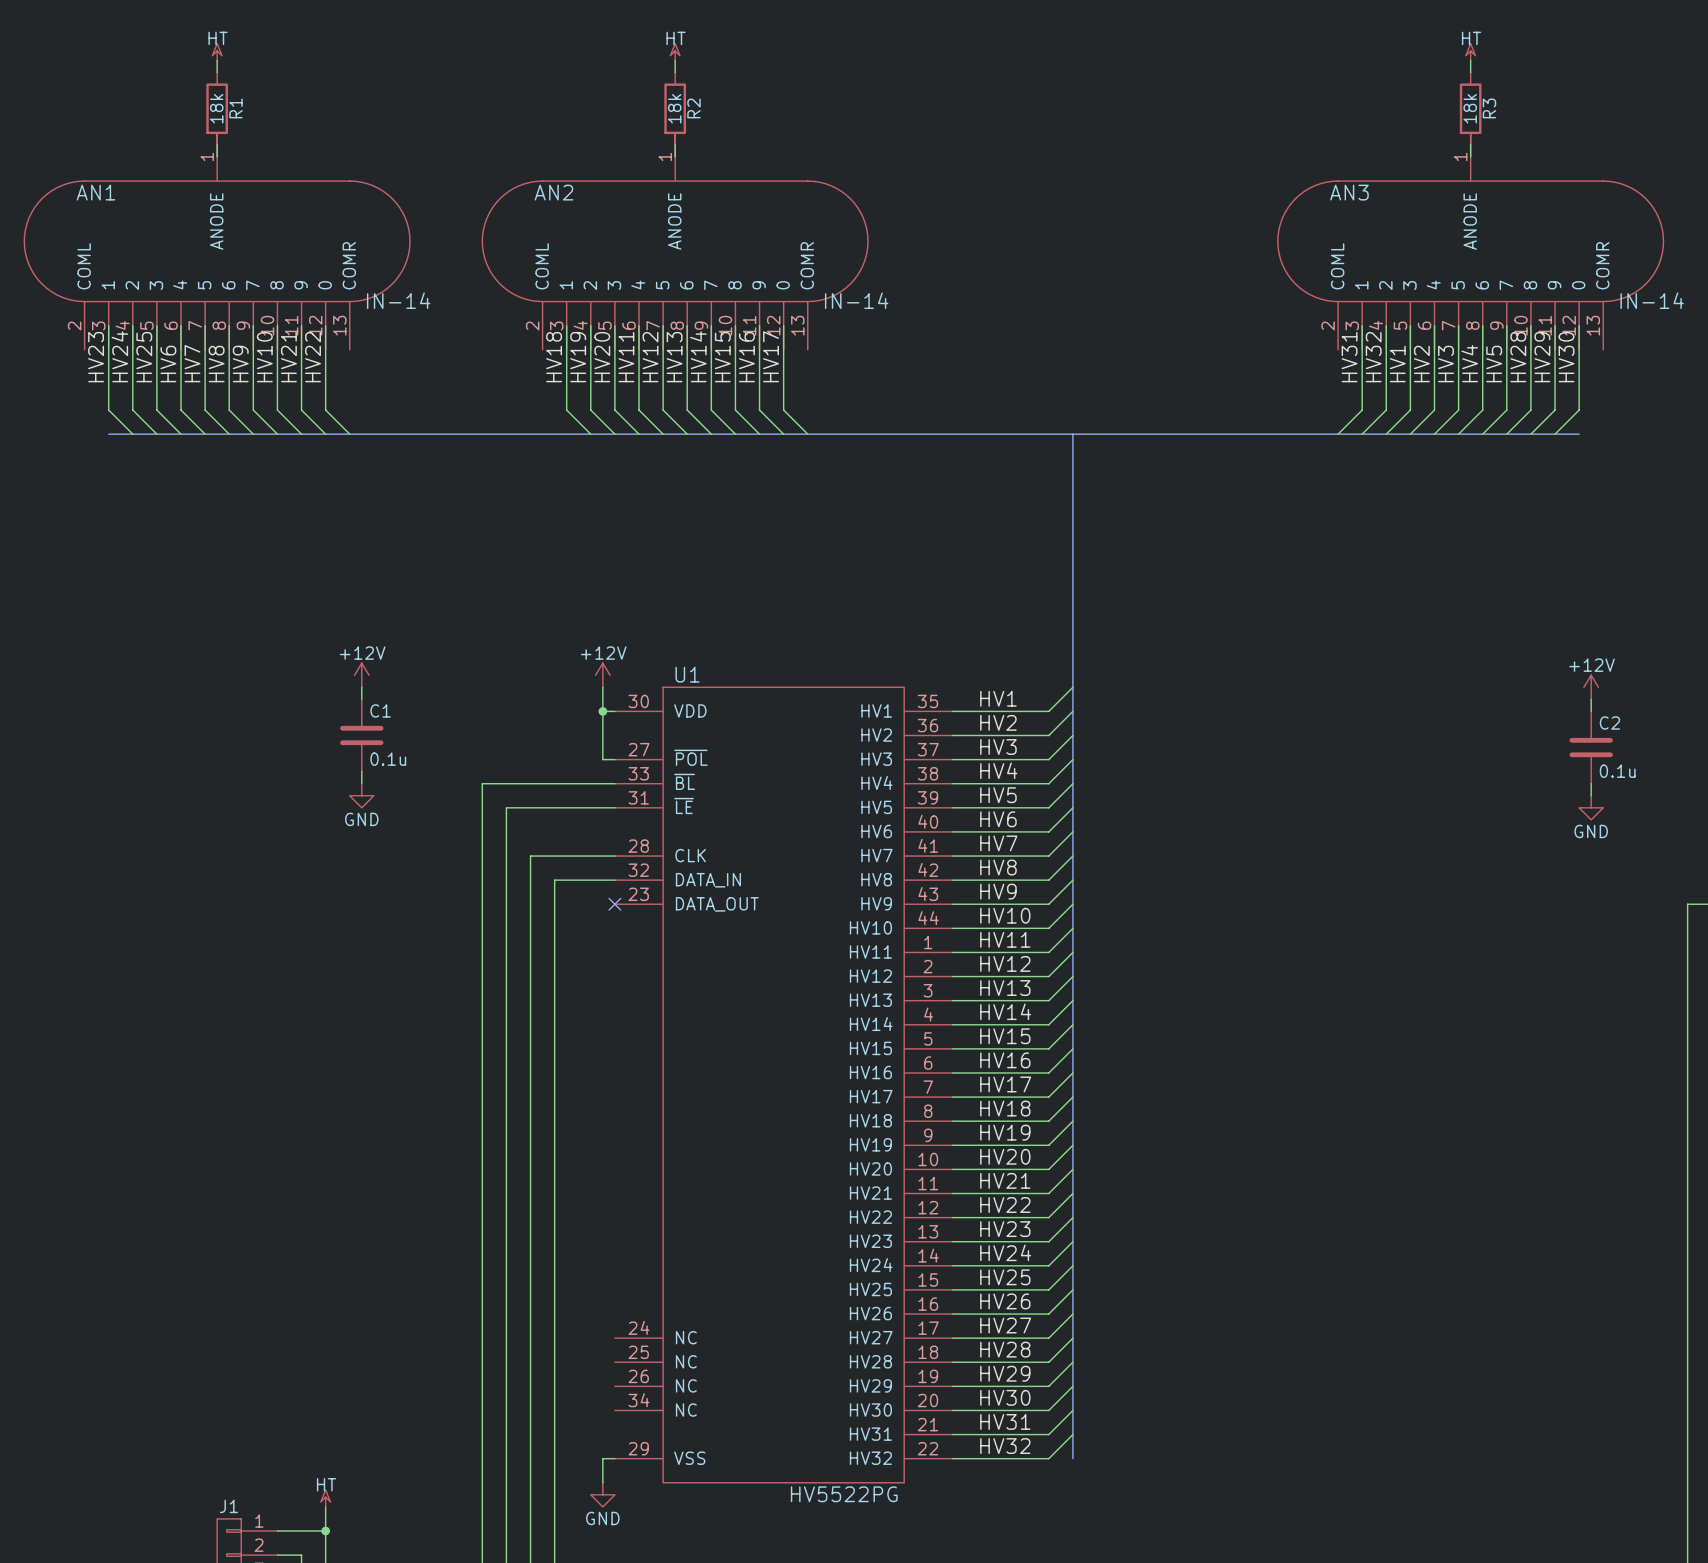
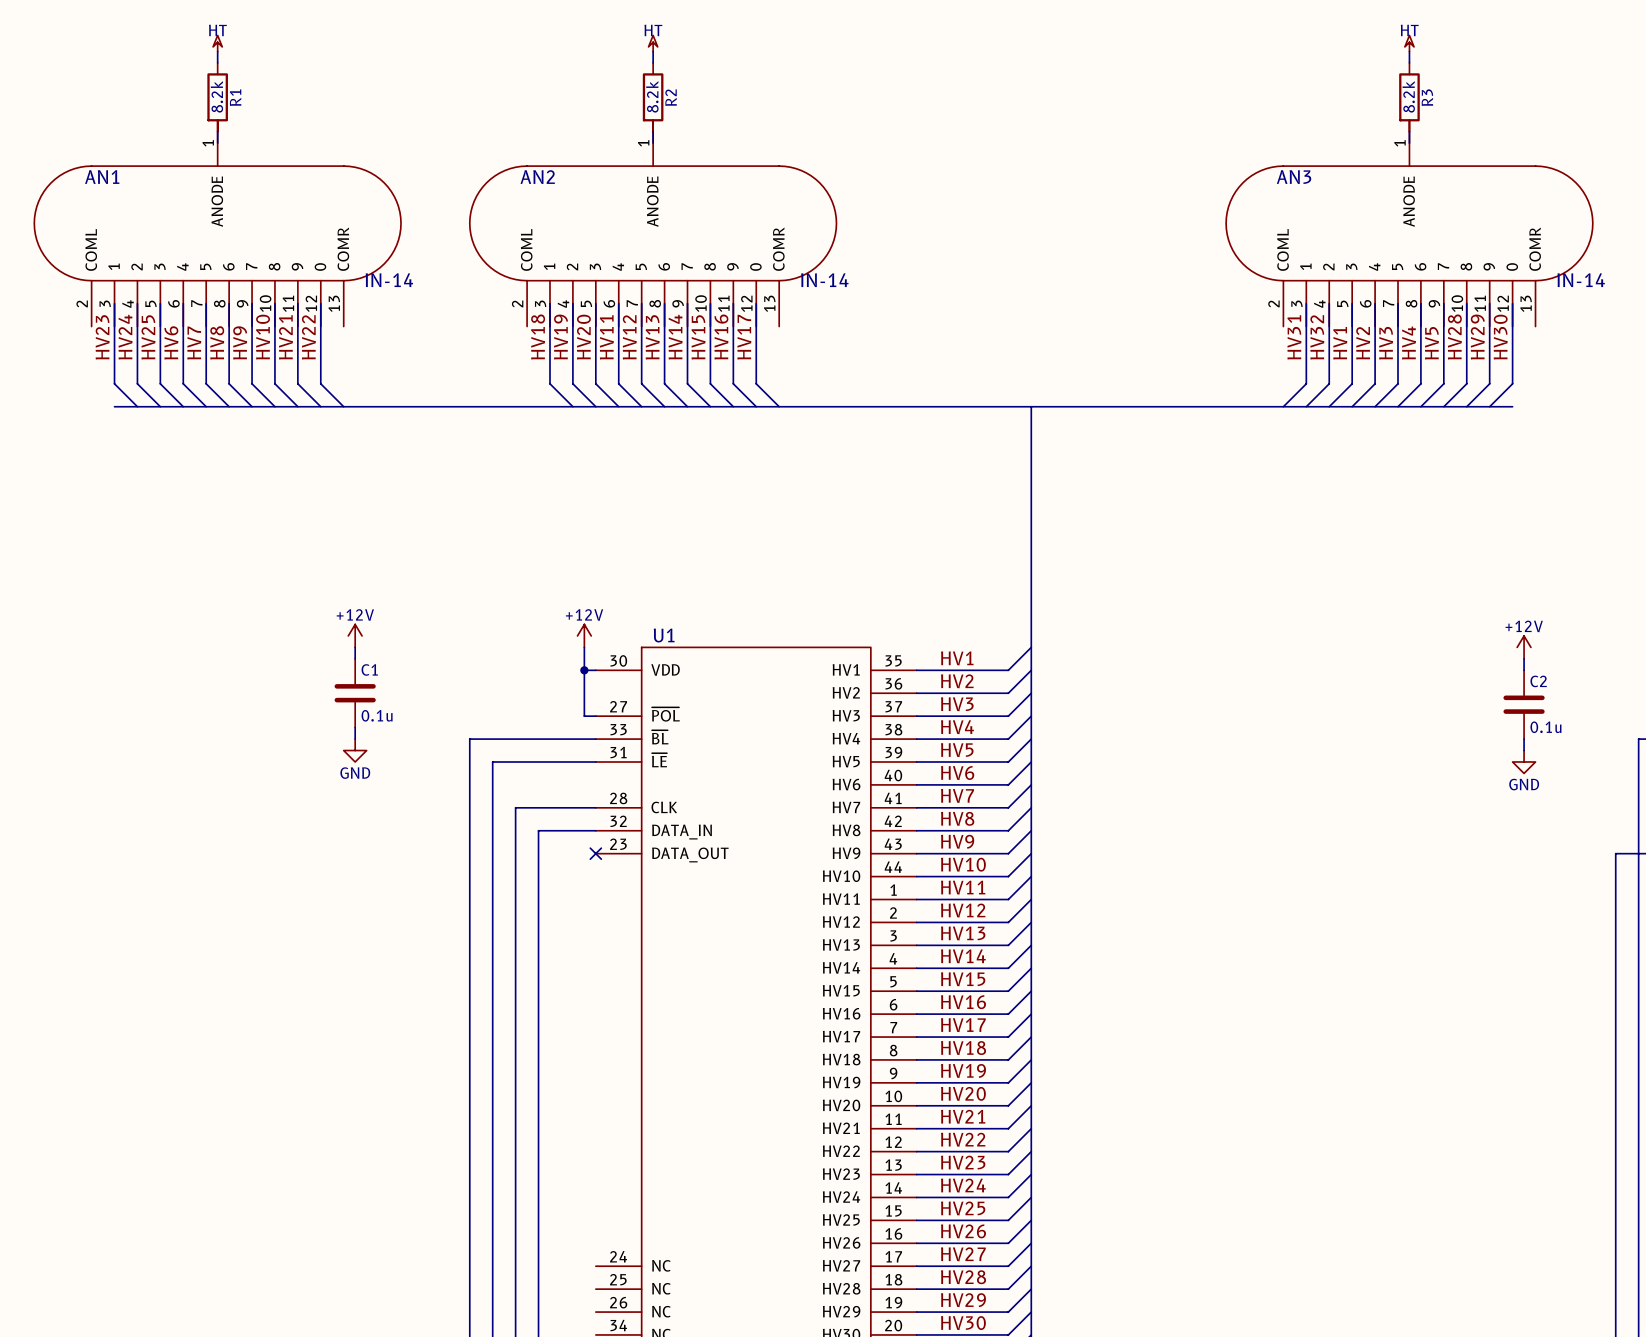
R1 value: 18k (216, 108) -> 8.2k (216, 96)
R2 value: 18k (674, 108) -> 8.2k (652, 96)
R3 value: 18k (1470, 108) -> 8.2k (1408, 96)

